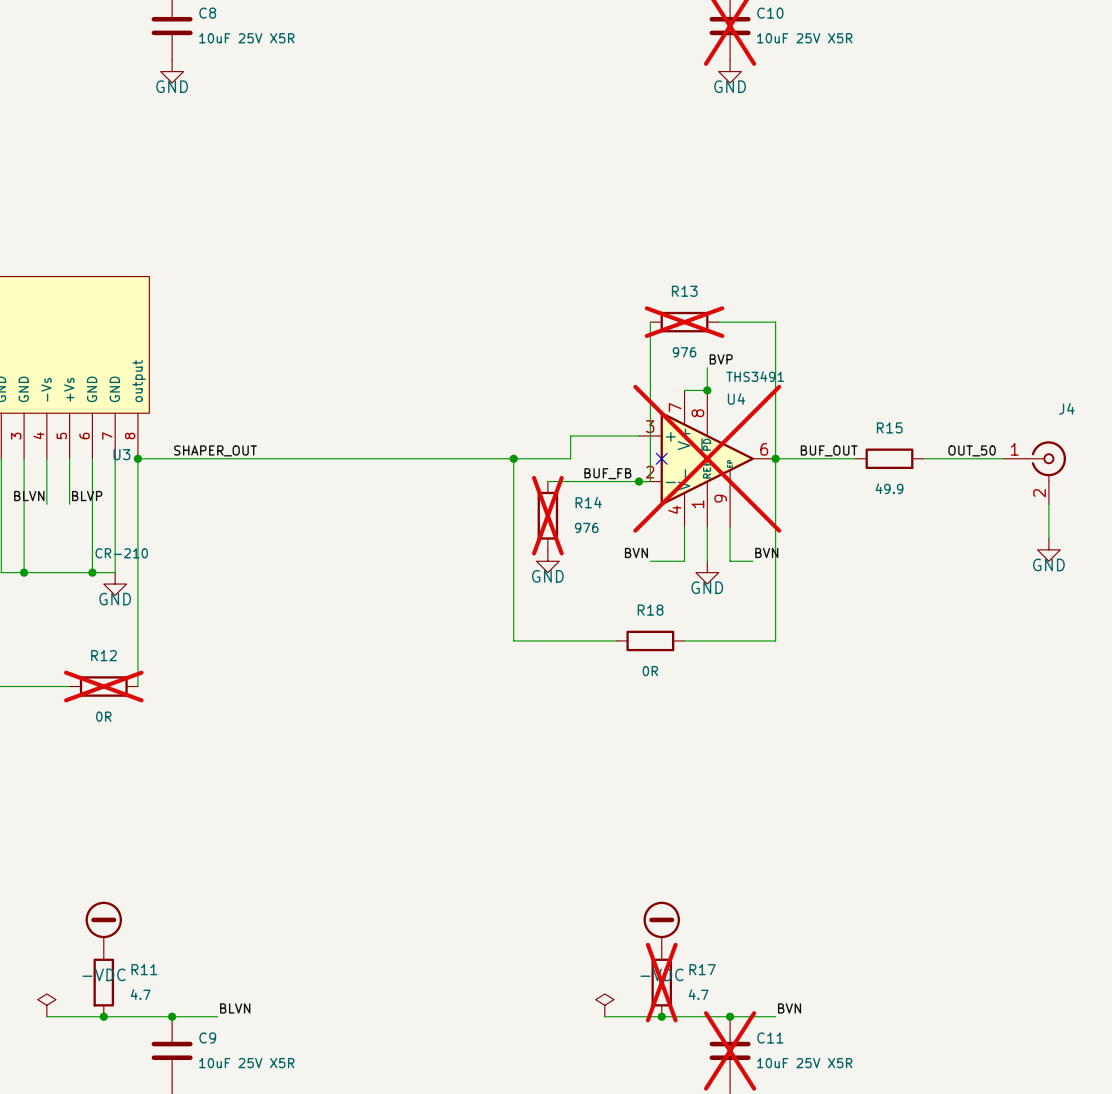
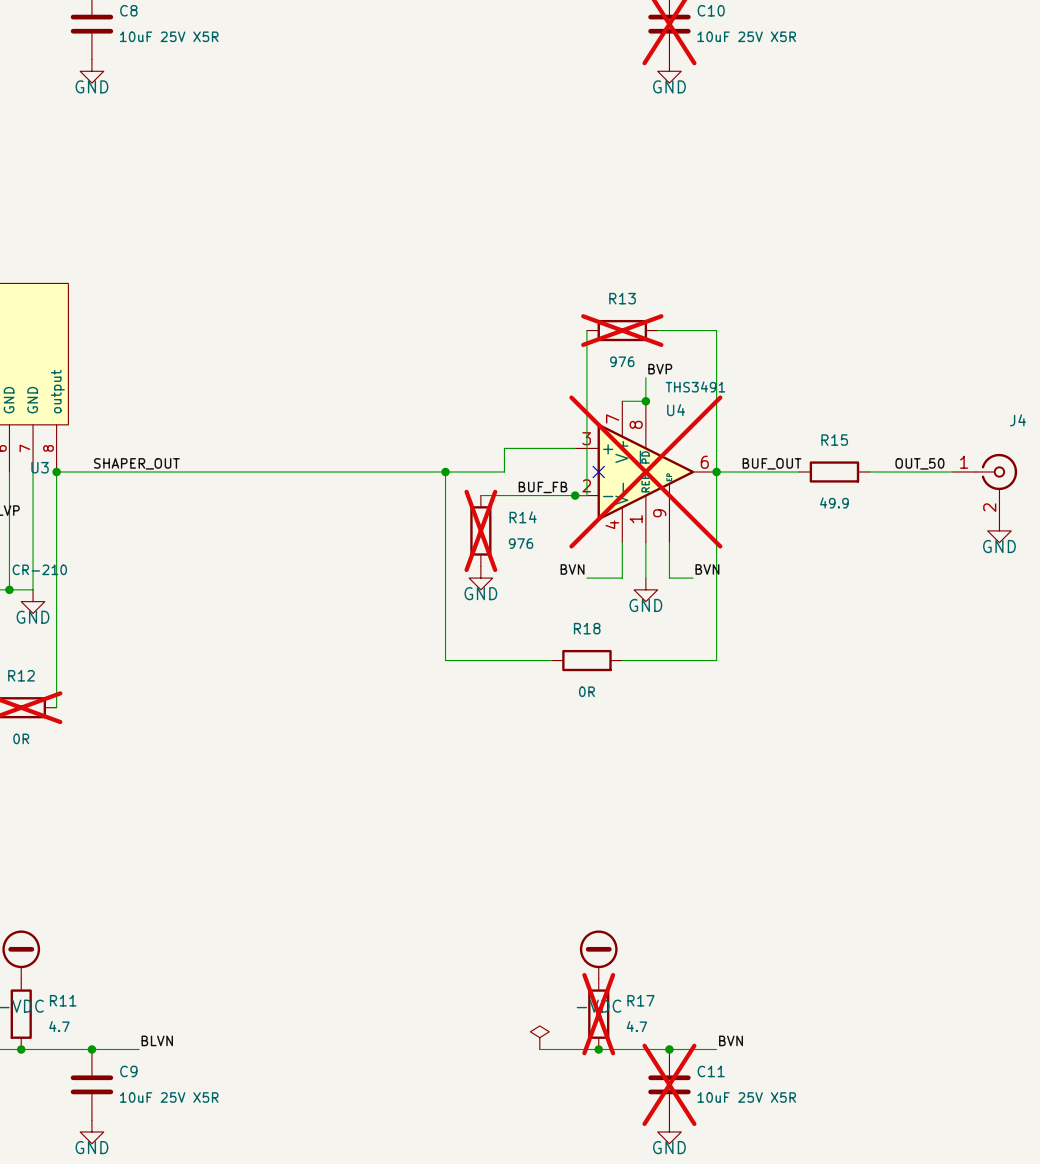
wire: (1048, 504) (1048, 538) -> none
power symbol position: GND (1048, 549) -> GND (999, 530)

